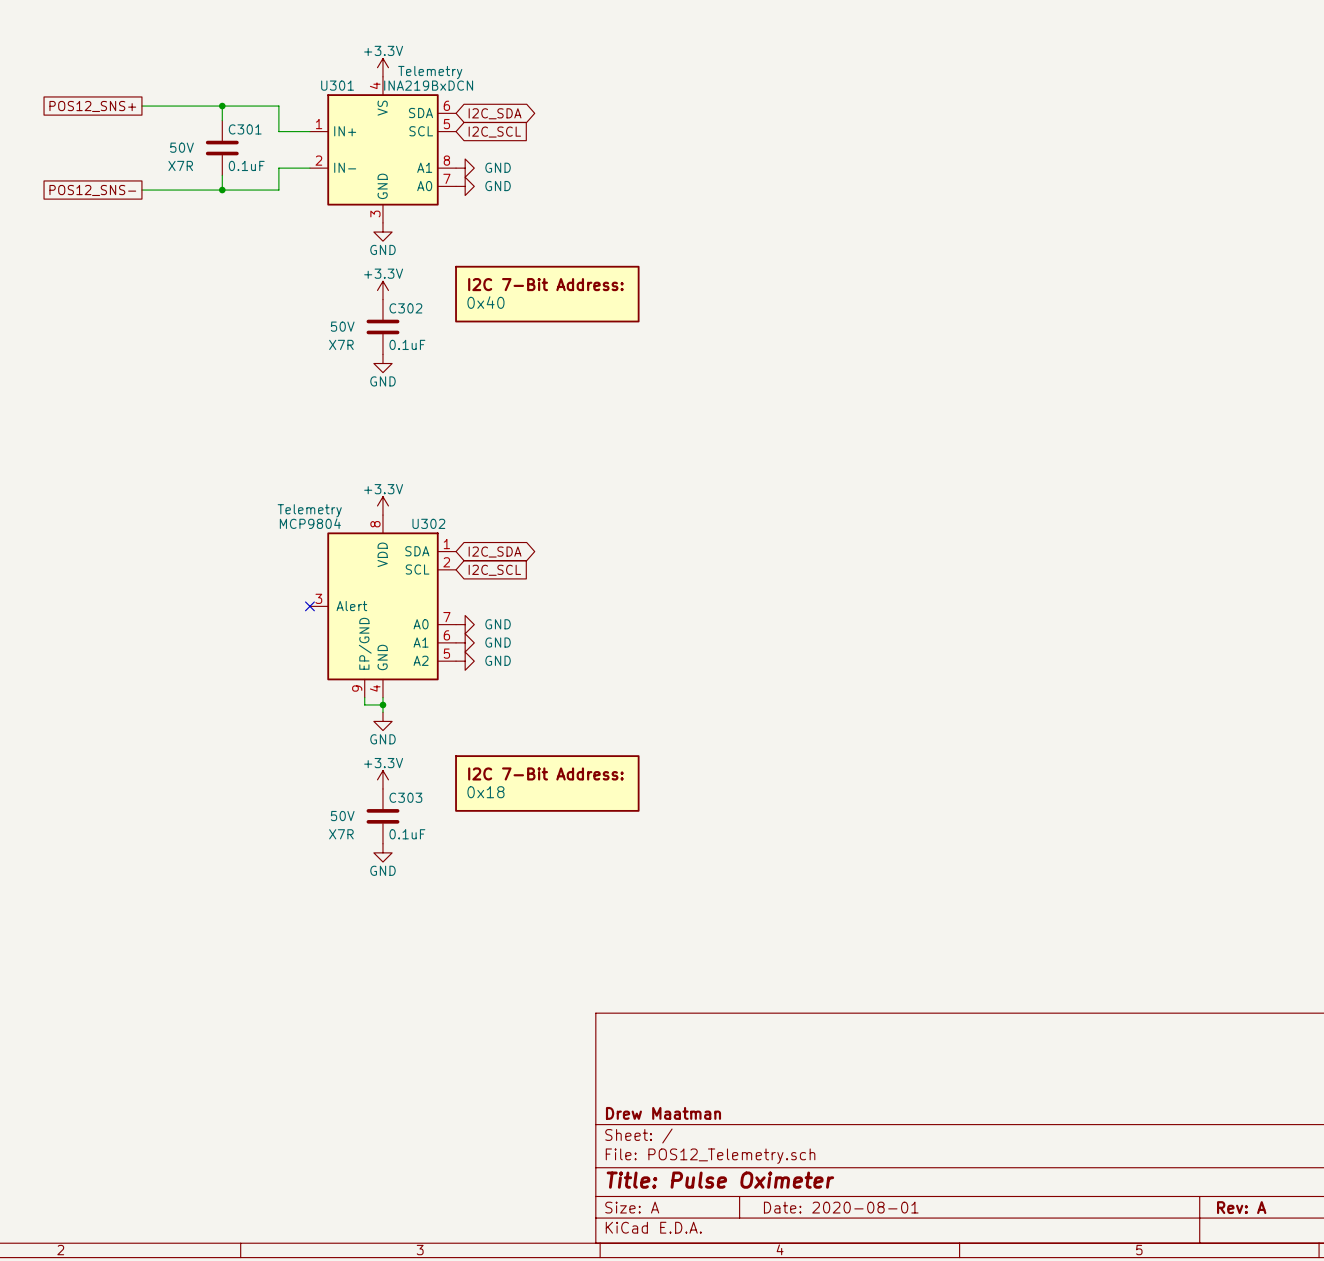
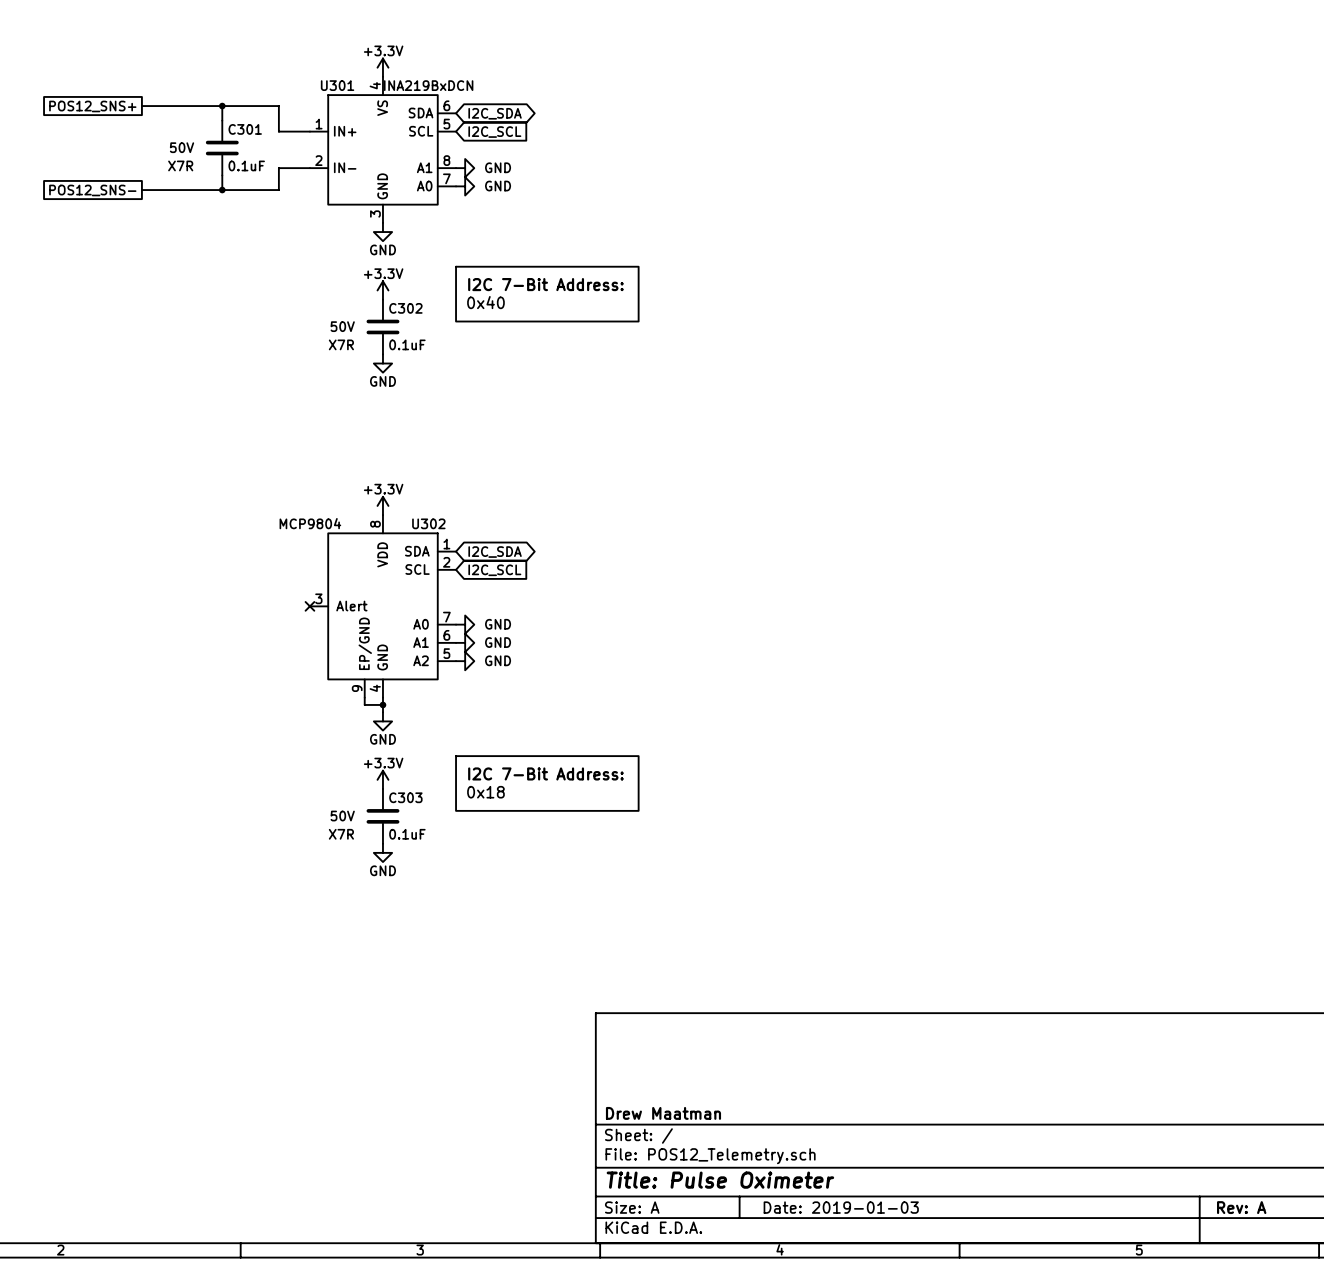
U301 text: Telemetry (430, 72) -> none
U302 text: Telemetry (309, 510) -> none
title block: Date: 2020-08-01 (841, 1207) -> Date: 2019-01-03 (841, 1207)

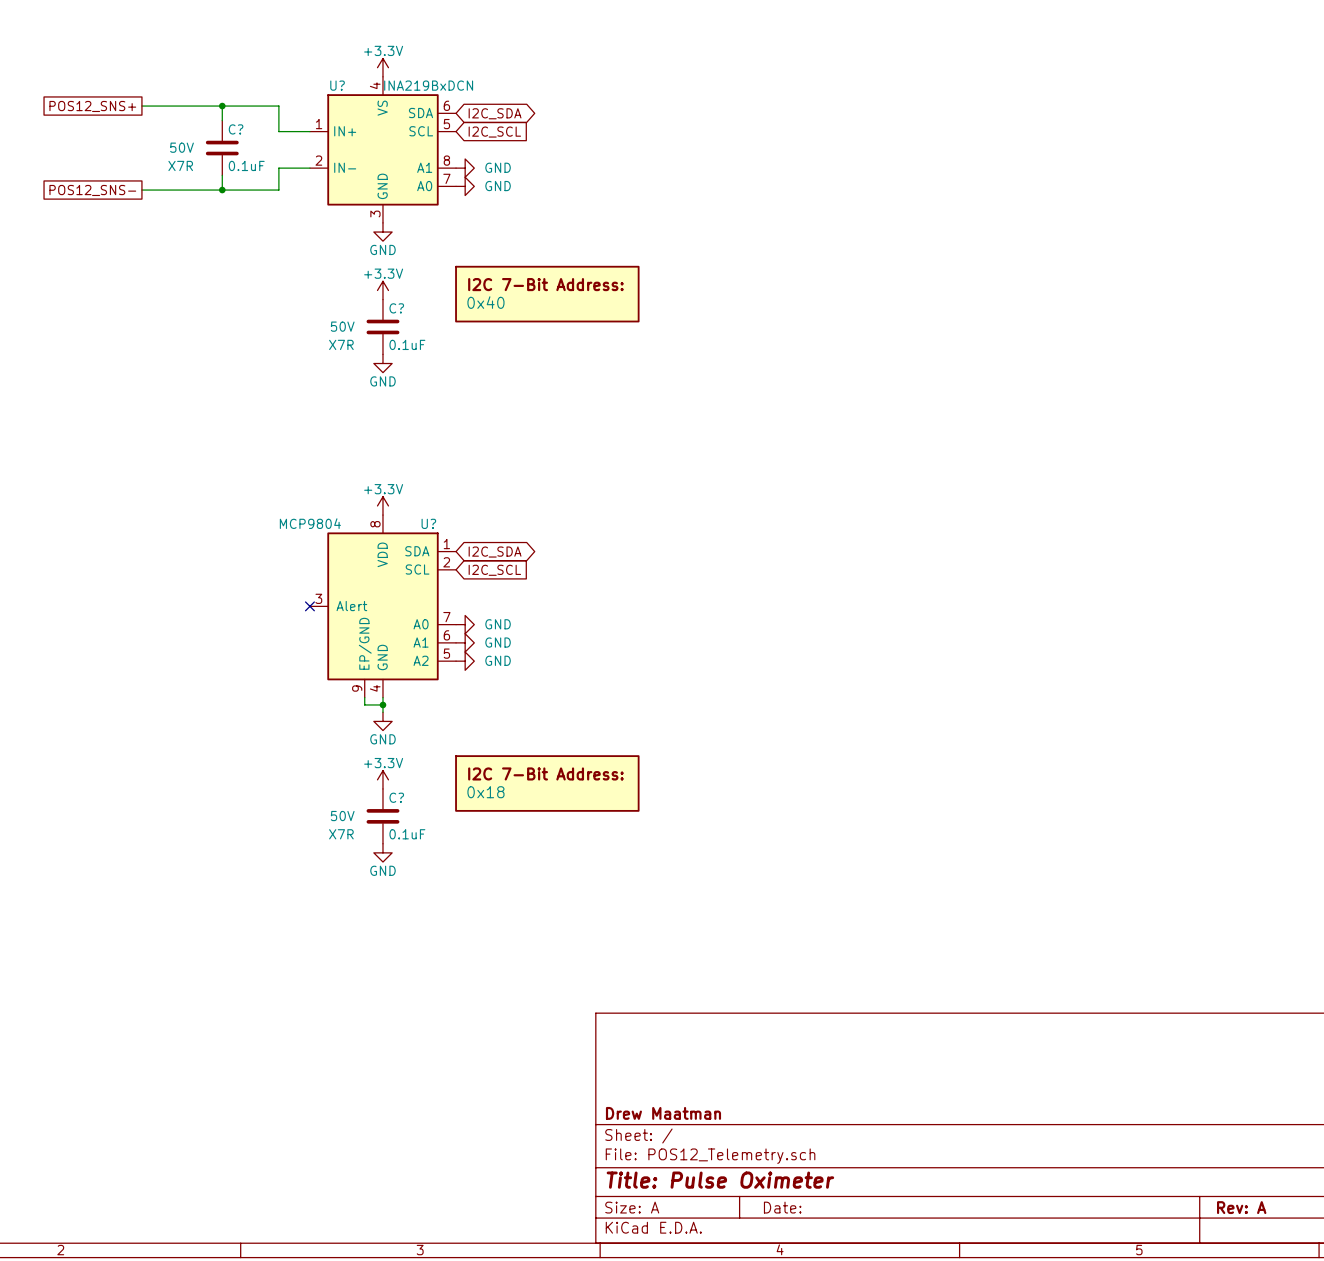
U301 name: U301 (337, 85) -> U? (337, 85)
C301 name: C301 (245, 129) -> C? (236, 129)
C302 name: C302 (405, 308) -> C? (396, 308)
U302 name: U302 (428, 523) -> U? (428, 523)
C303 name: C303 (405, 797) -> C? (396, 797)
title block: Date: 2019-01-03 (841, 1207) -> Date: (782, 1207)

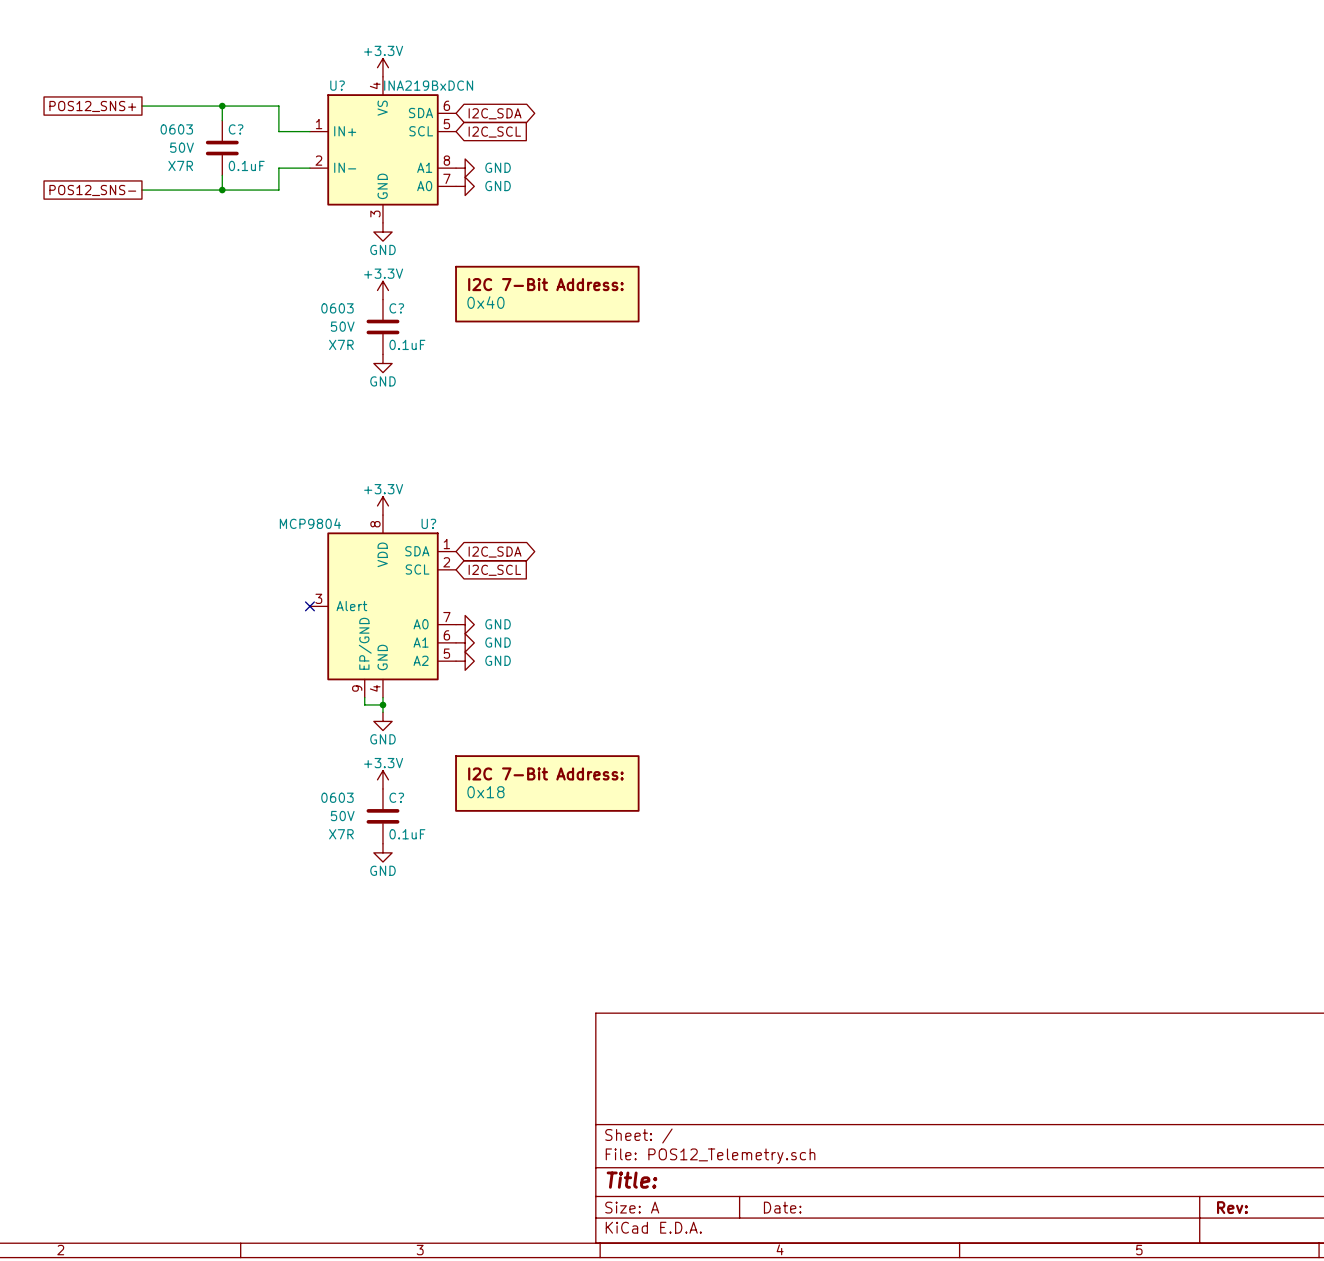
C? text: none -> 0603 (176, 129)
C? text: none -> 0603 (337, 308)
C? text: none -> 0603 (337, 797)
title block: Drew Maatman (663, 1113) -> none
title block: Title: Pulse Oximeter (720, 1180) -> Title: (631, 1180)
title block: Rev: A (1241, 1207) -> Rev: (1232, 1207)

